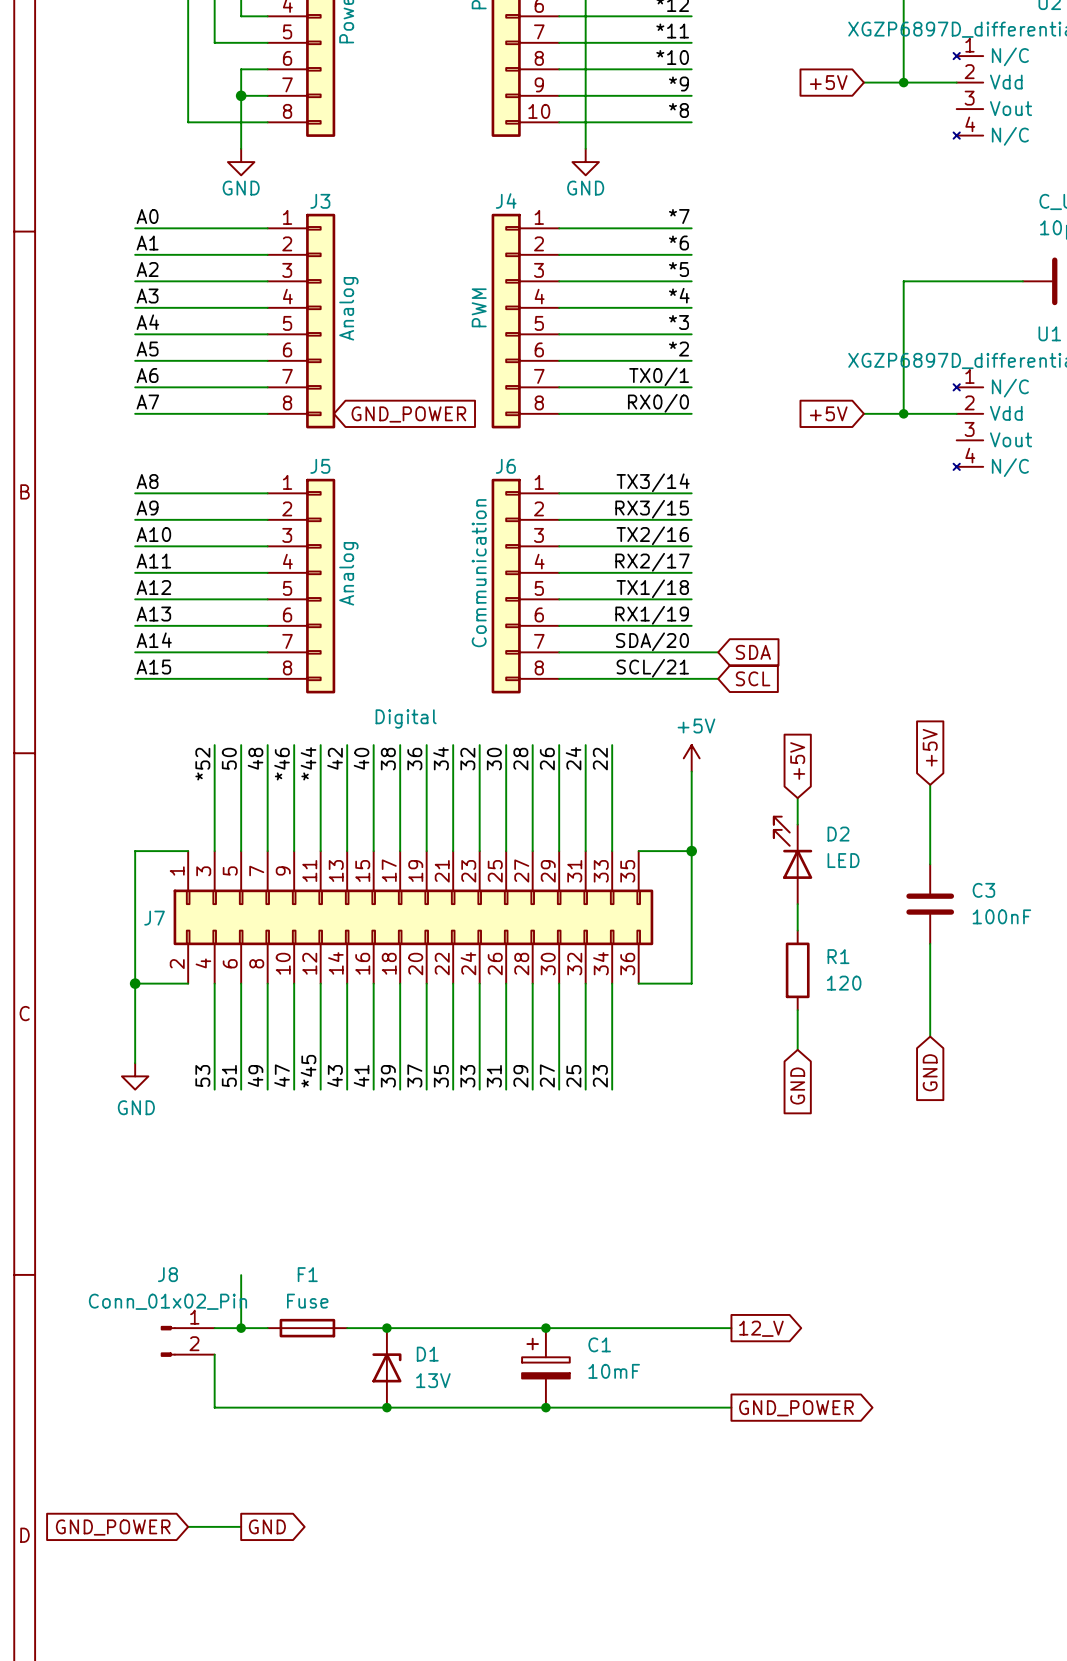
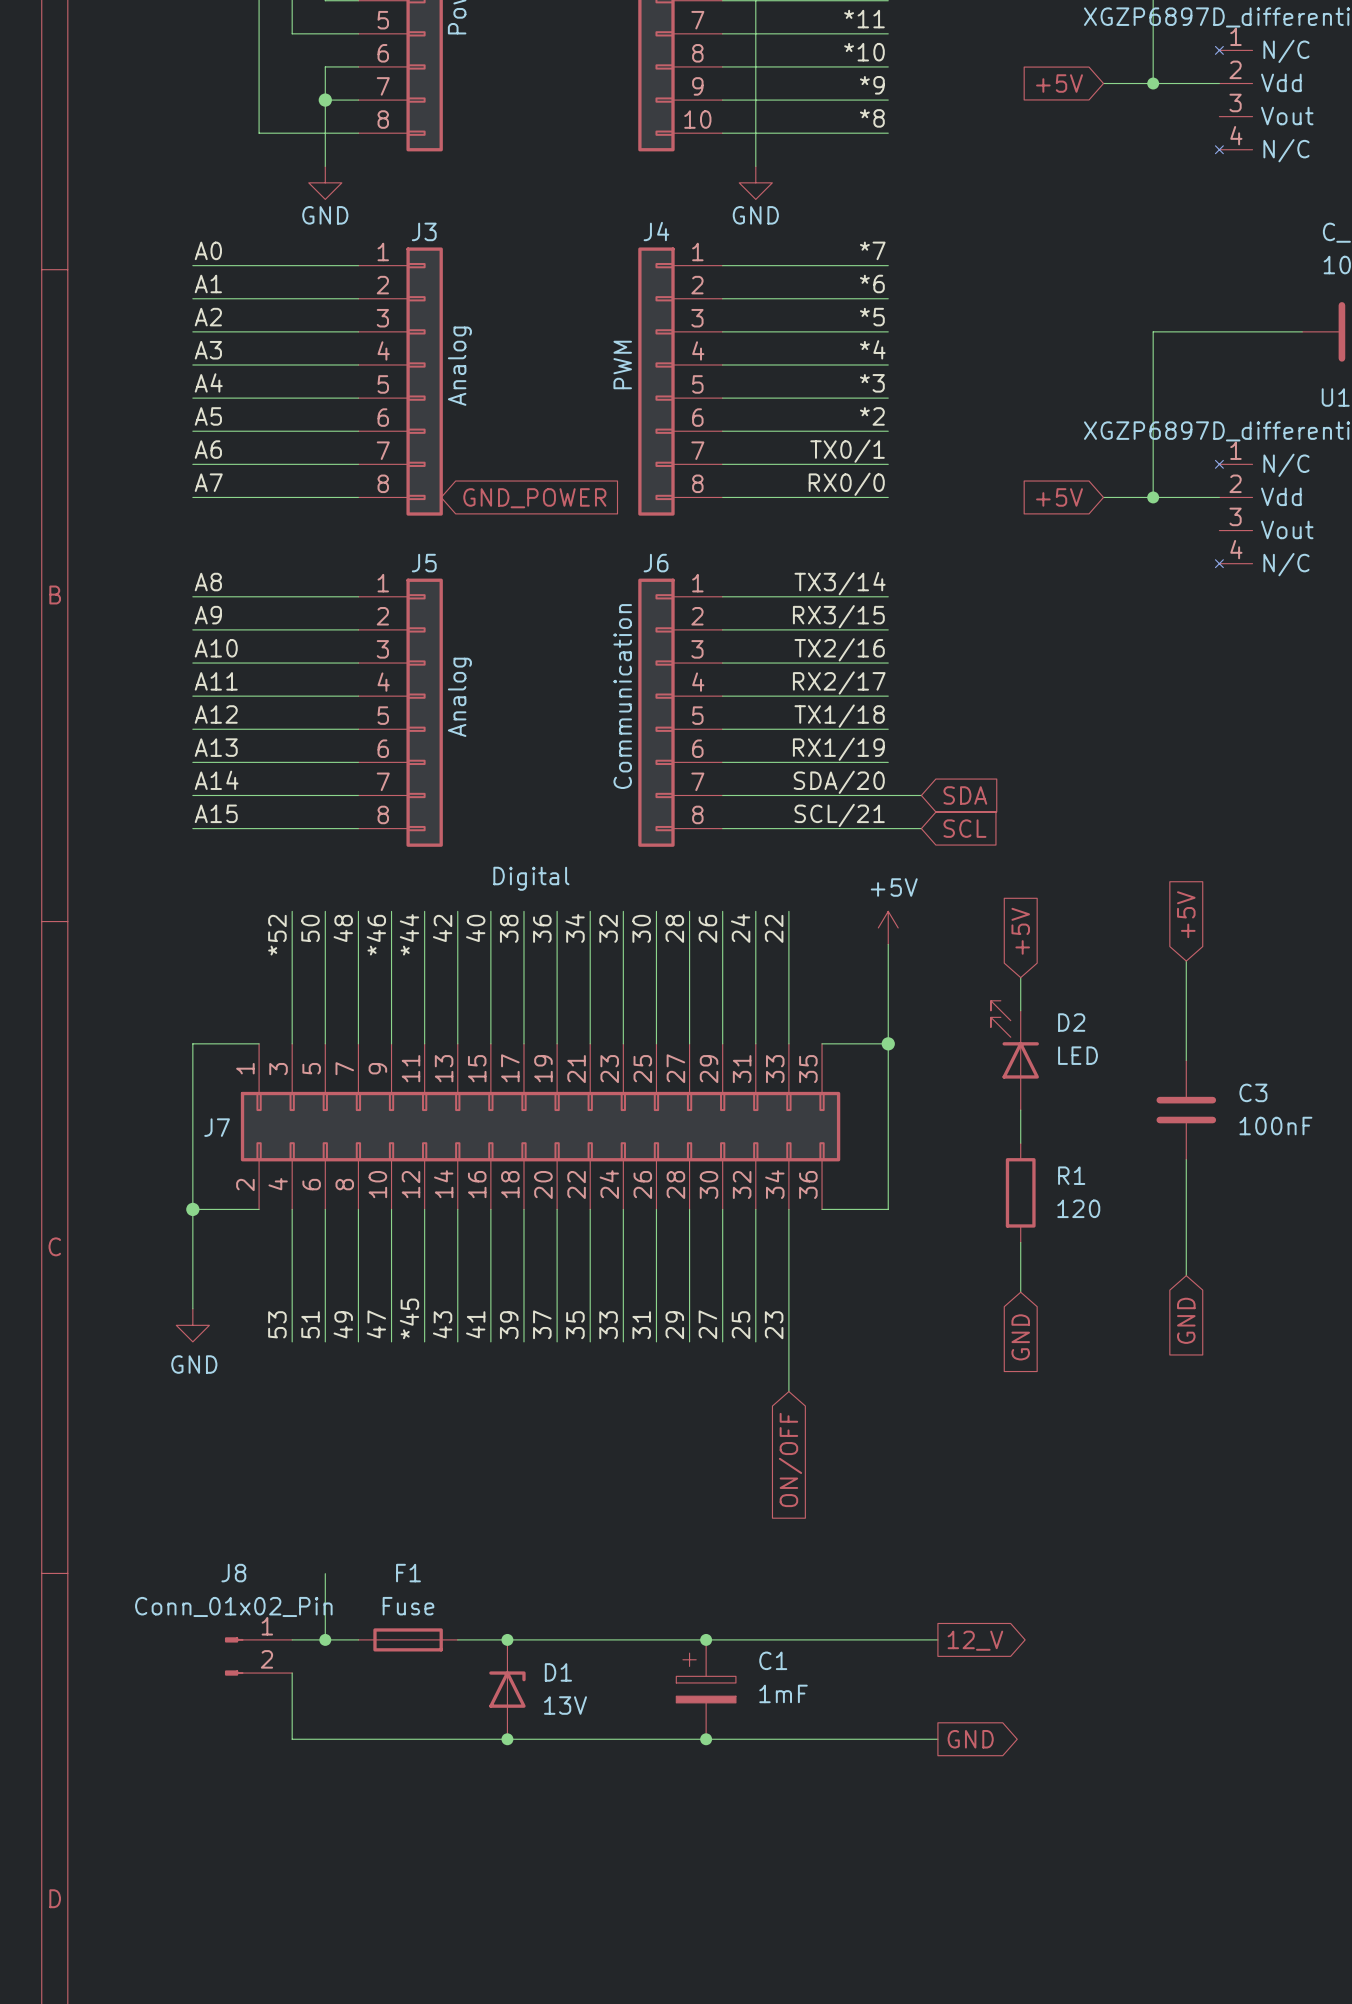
wire: none -> (788, 1341) (788, 1391)
global label: none -> ON/OFF (790, 1459)
C1 value: 10mF (614, 1371) -> 1mF (783, 1693)
global label: GND_POWER (796, 1408) -> GND (970, 1739)
wire: (188, 1526) (241, 1526) -> none
global label: GND (267, 1526) -> none
global label: GND_POWER (113, 1527) -> none

